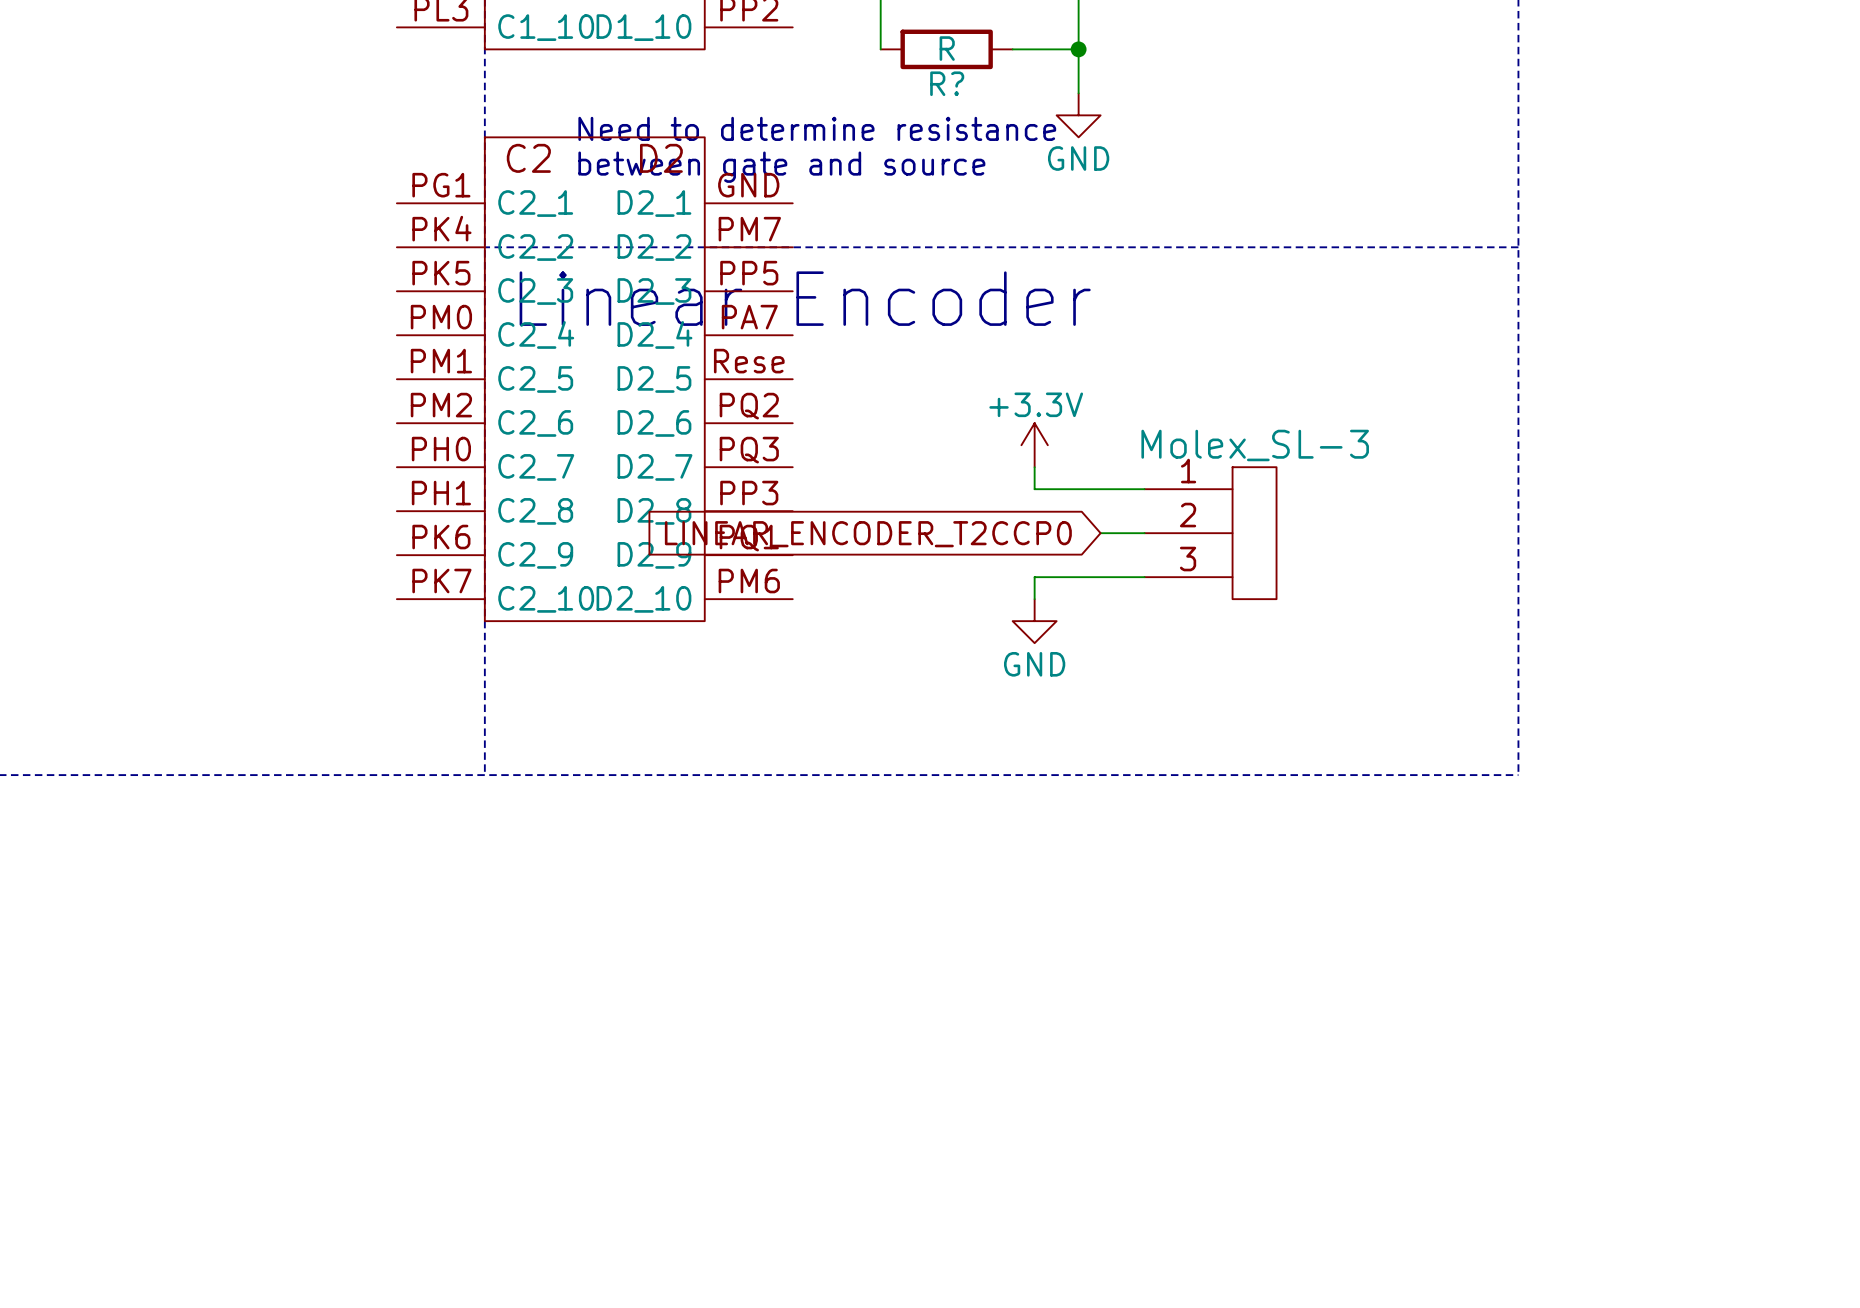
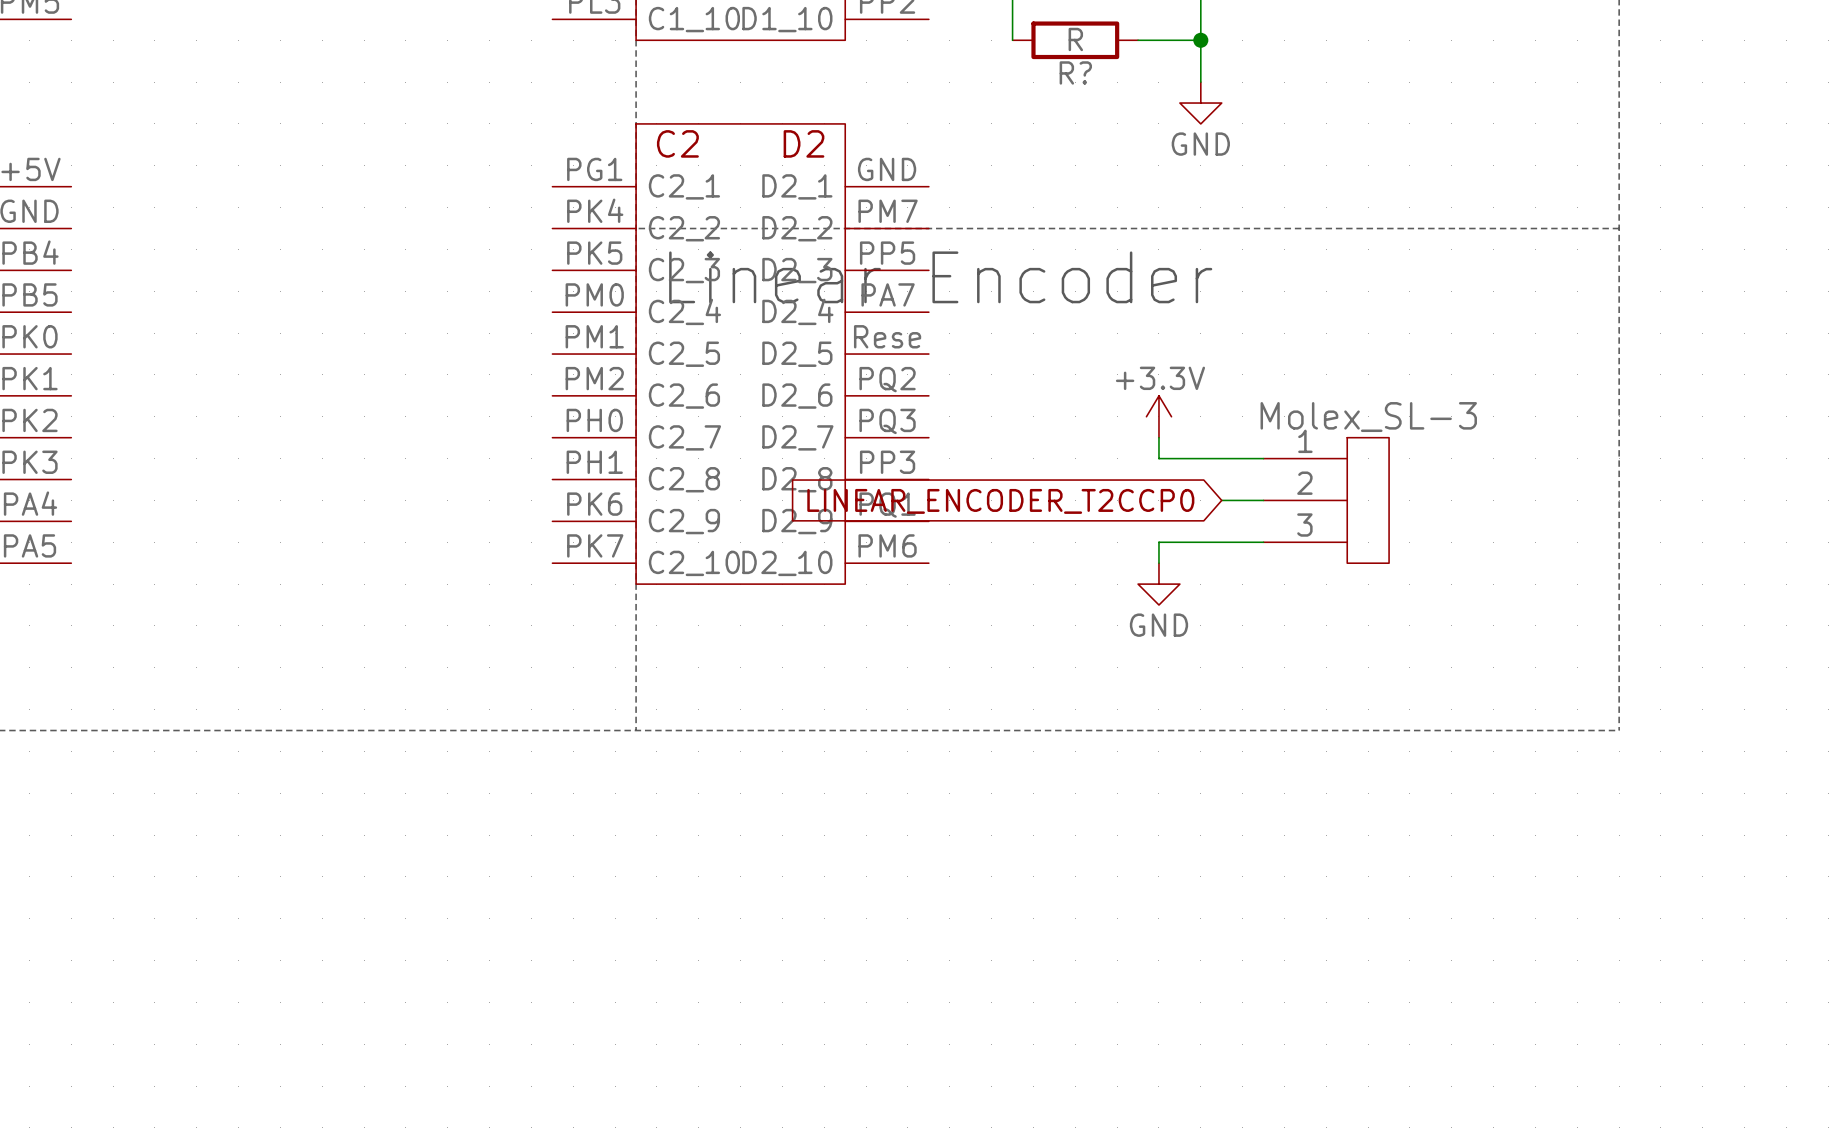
text: Need to determine resistance (817, 128) -> none
text: between gate and source (781, 167) -> none

